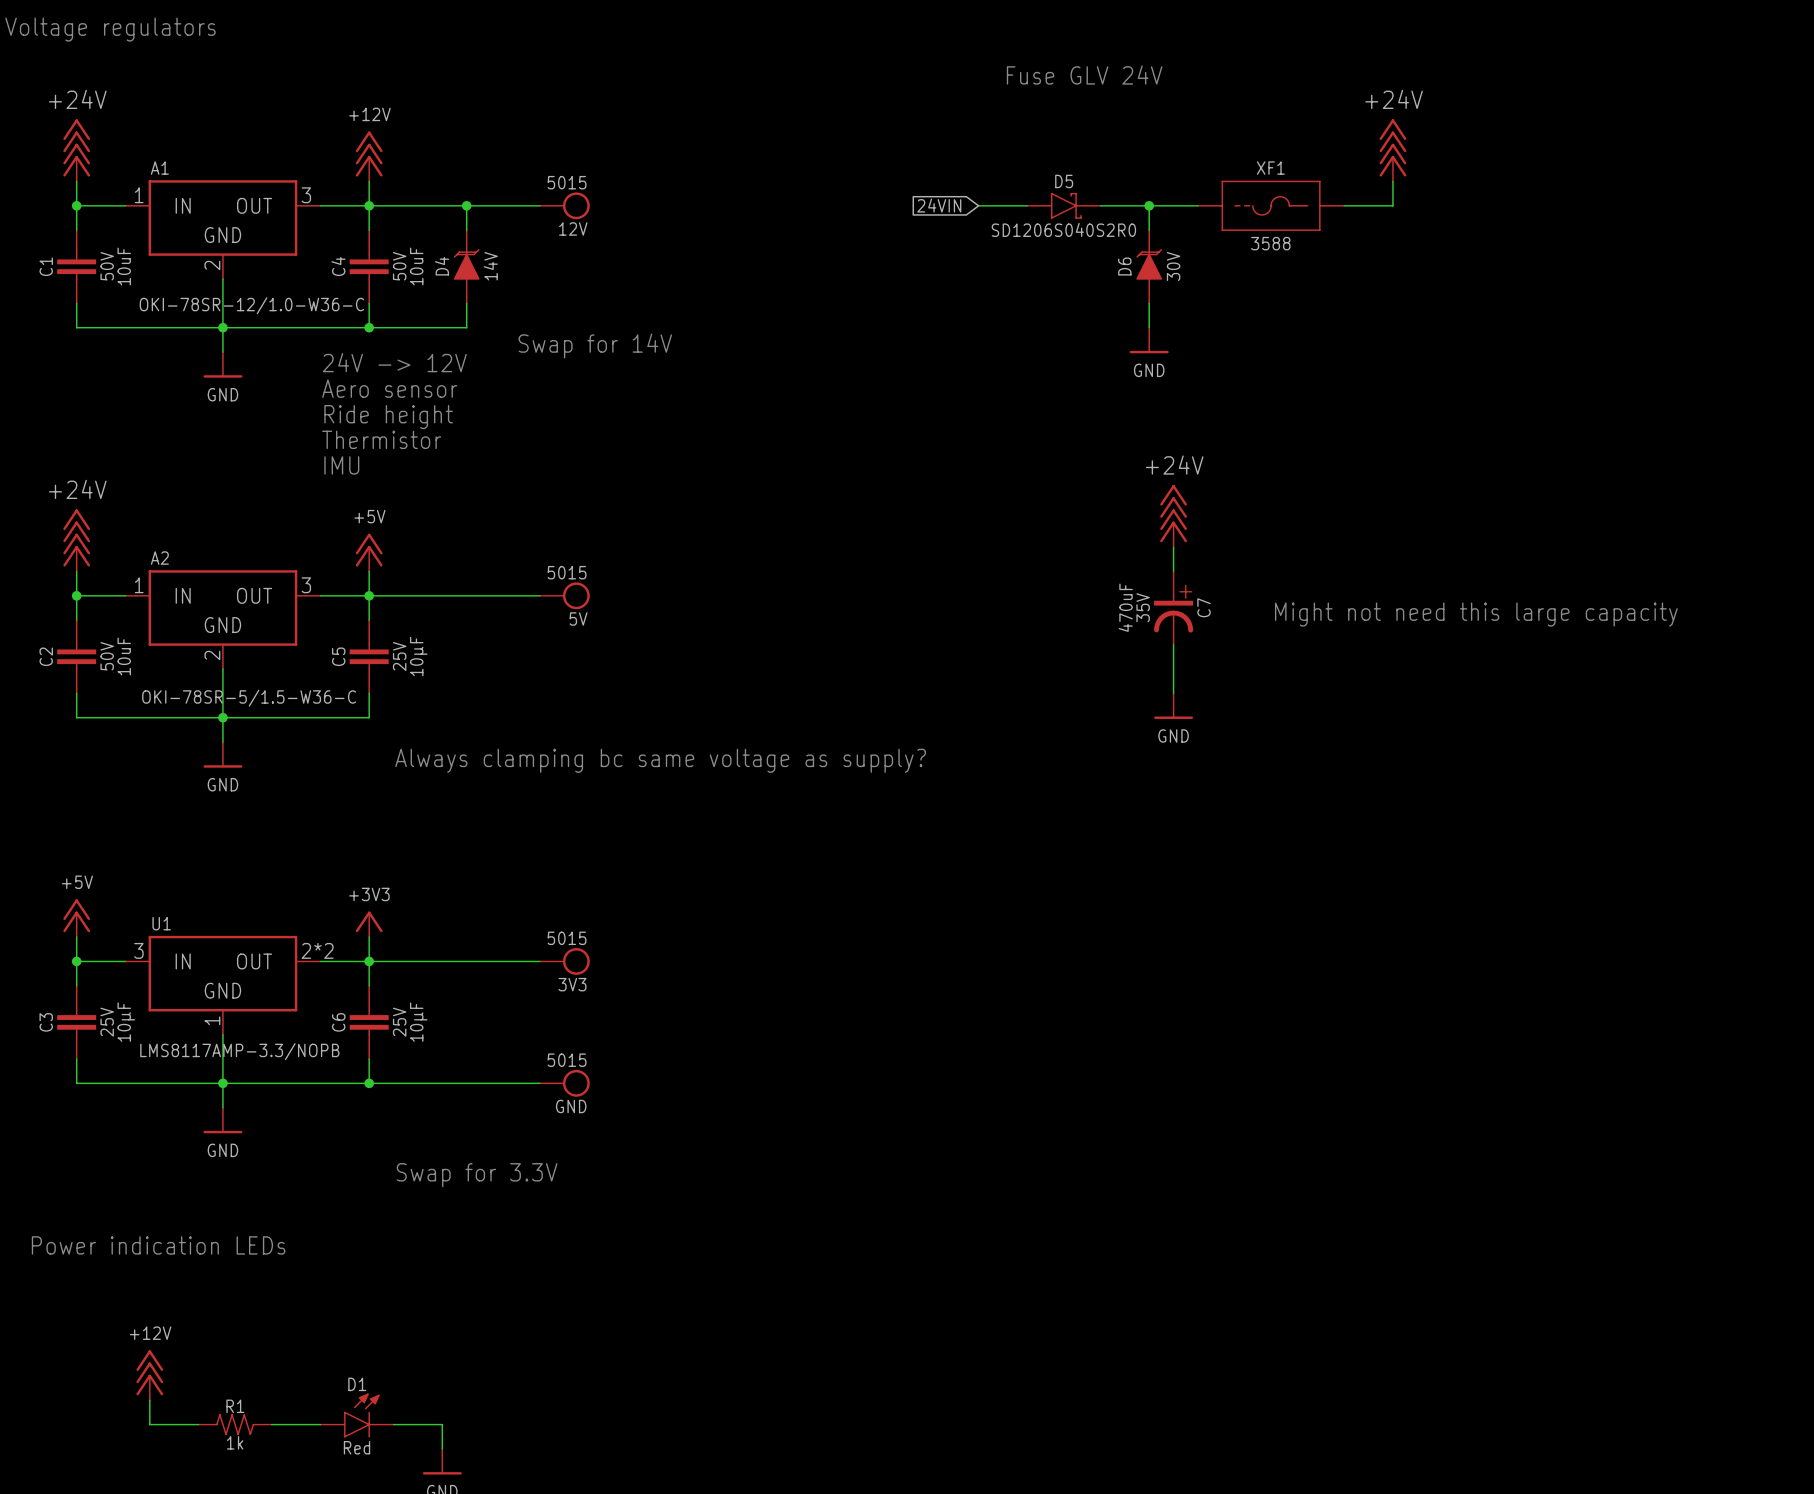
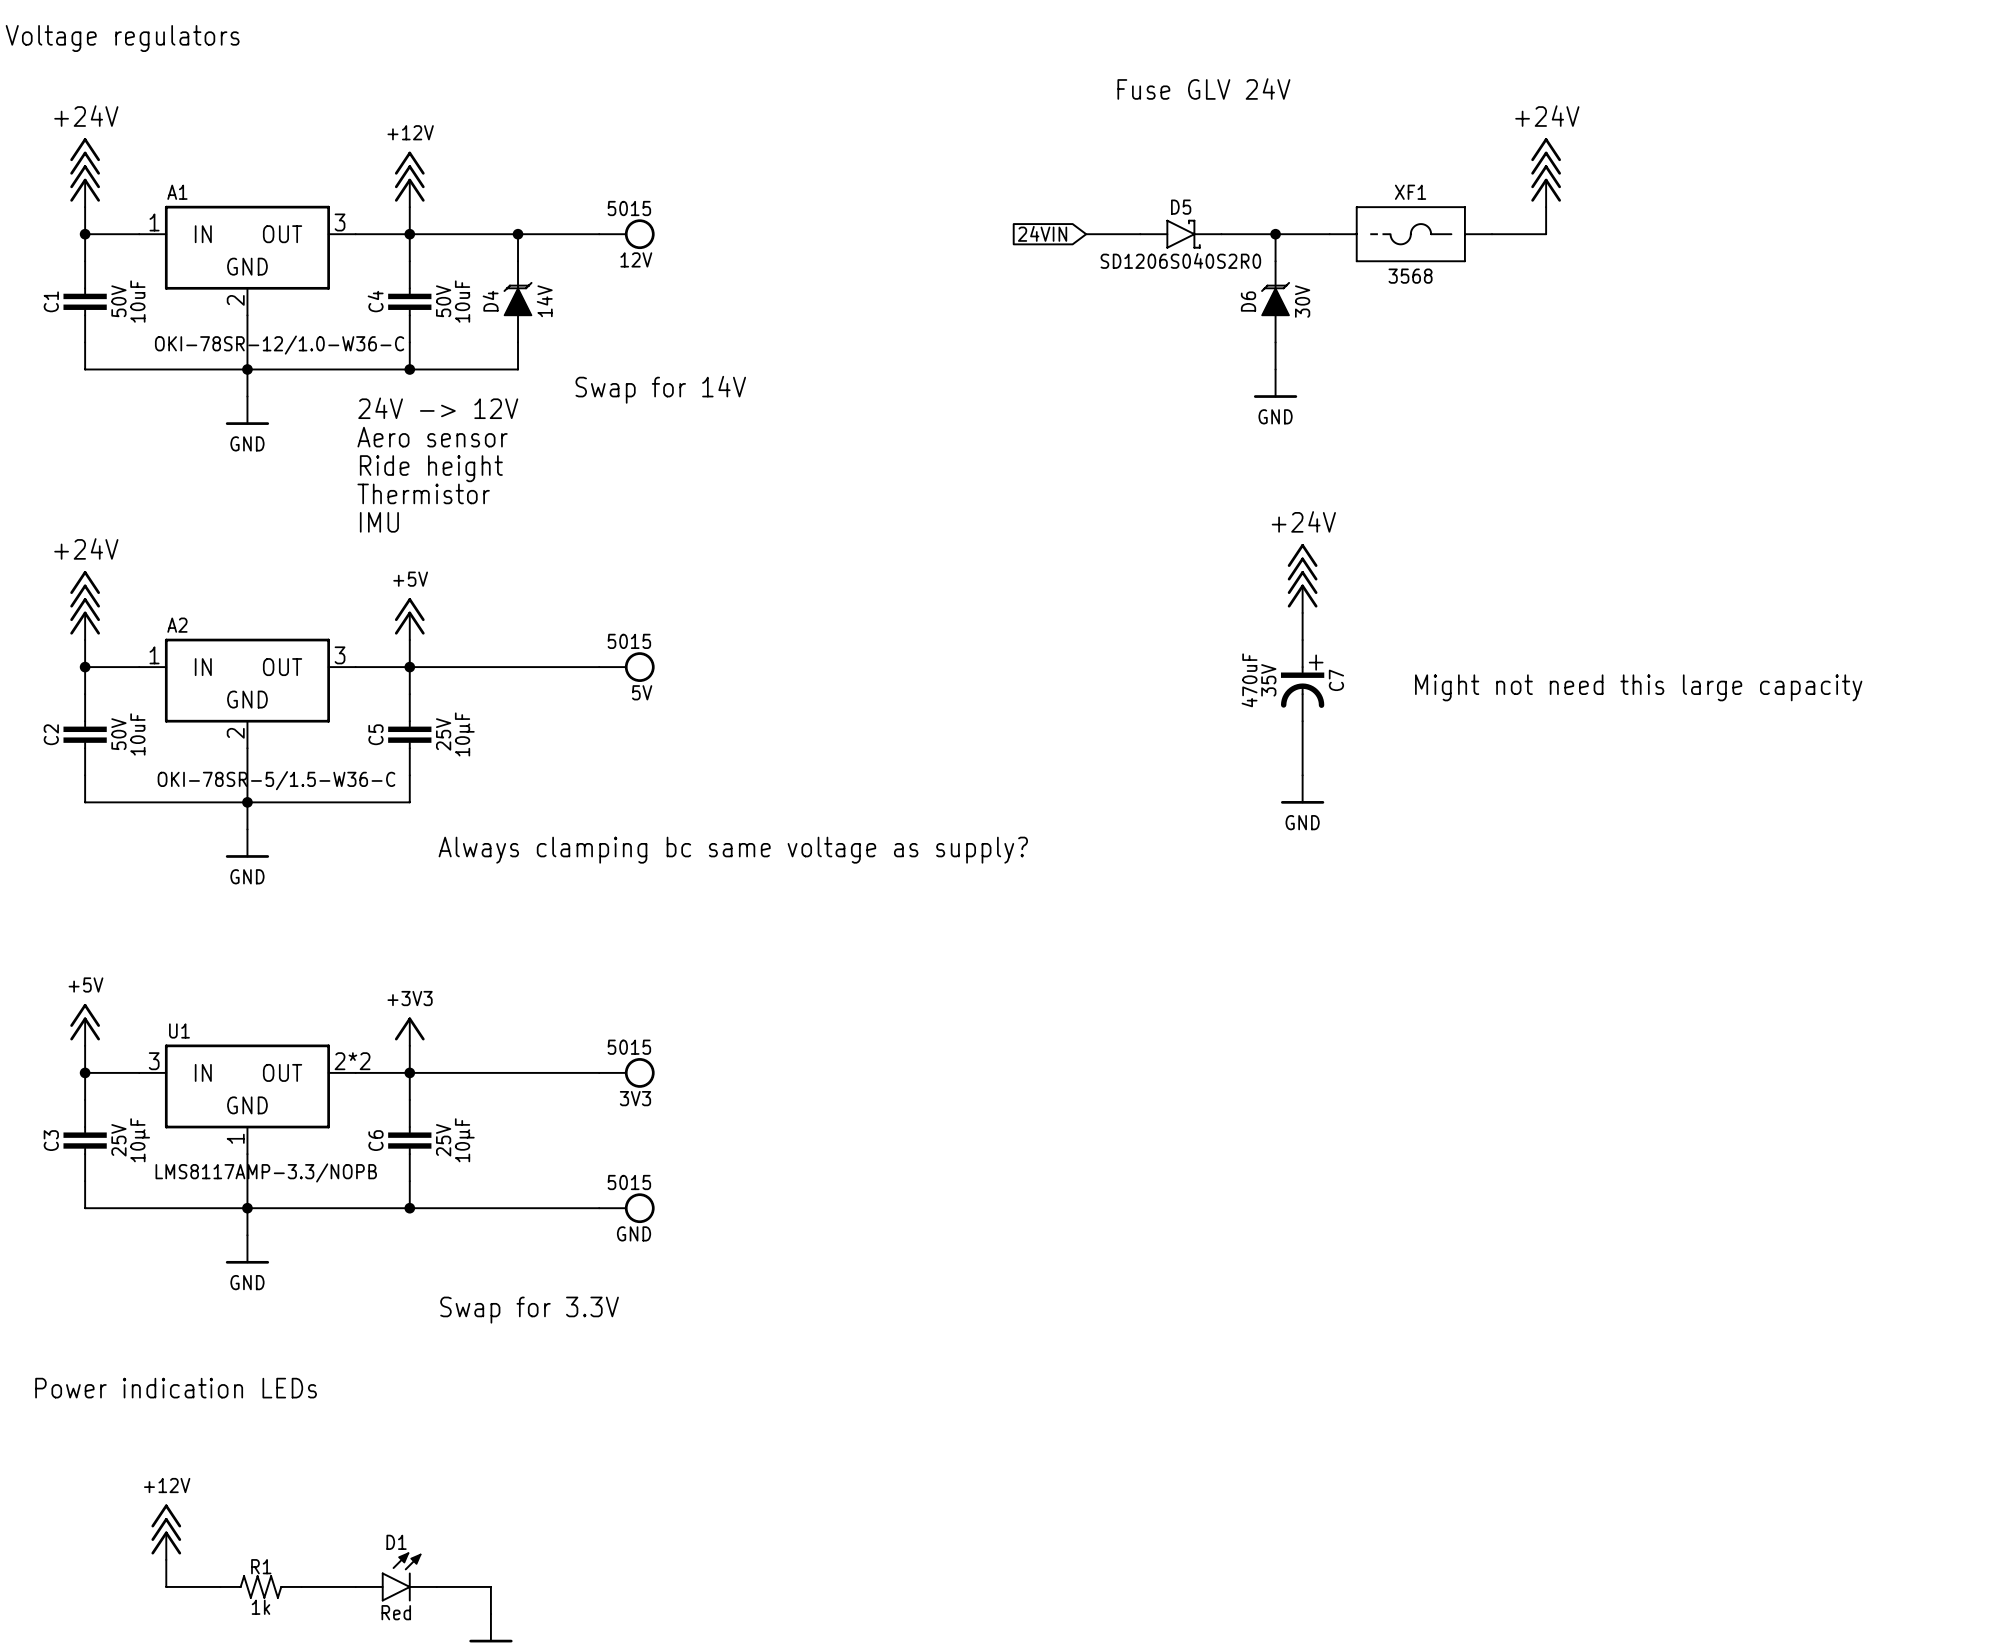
XF1 text: 3588 (1270, 243) -> 3568 (1410, 276)

